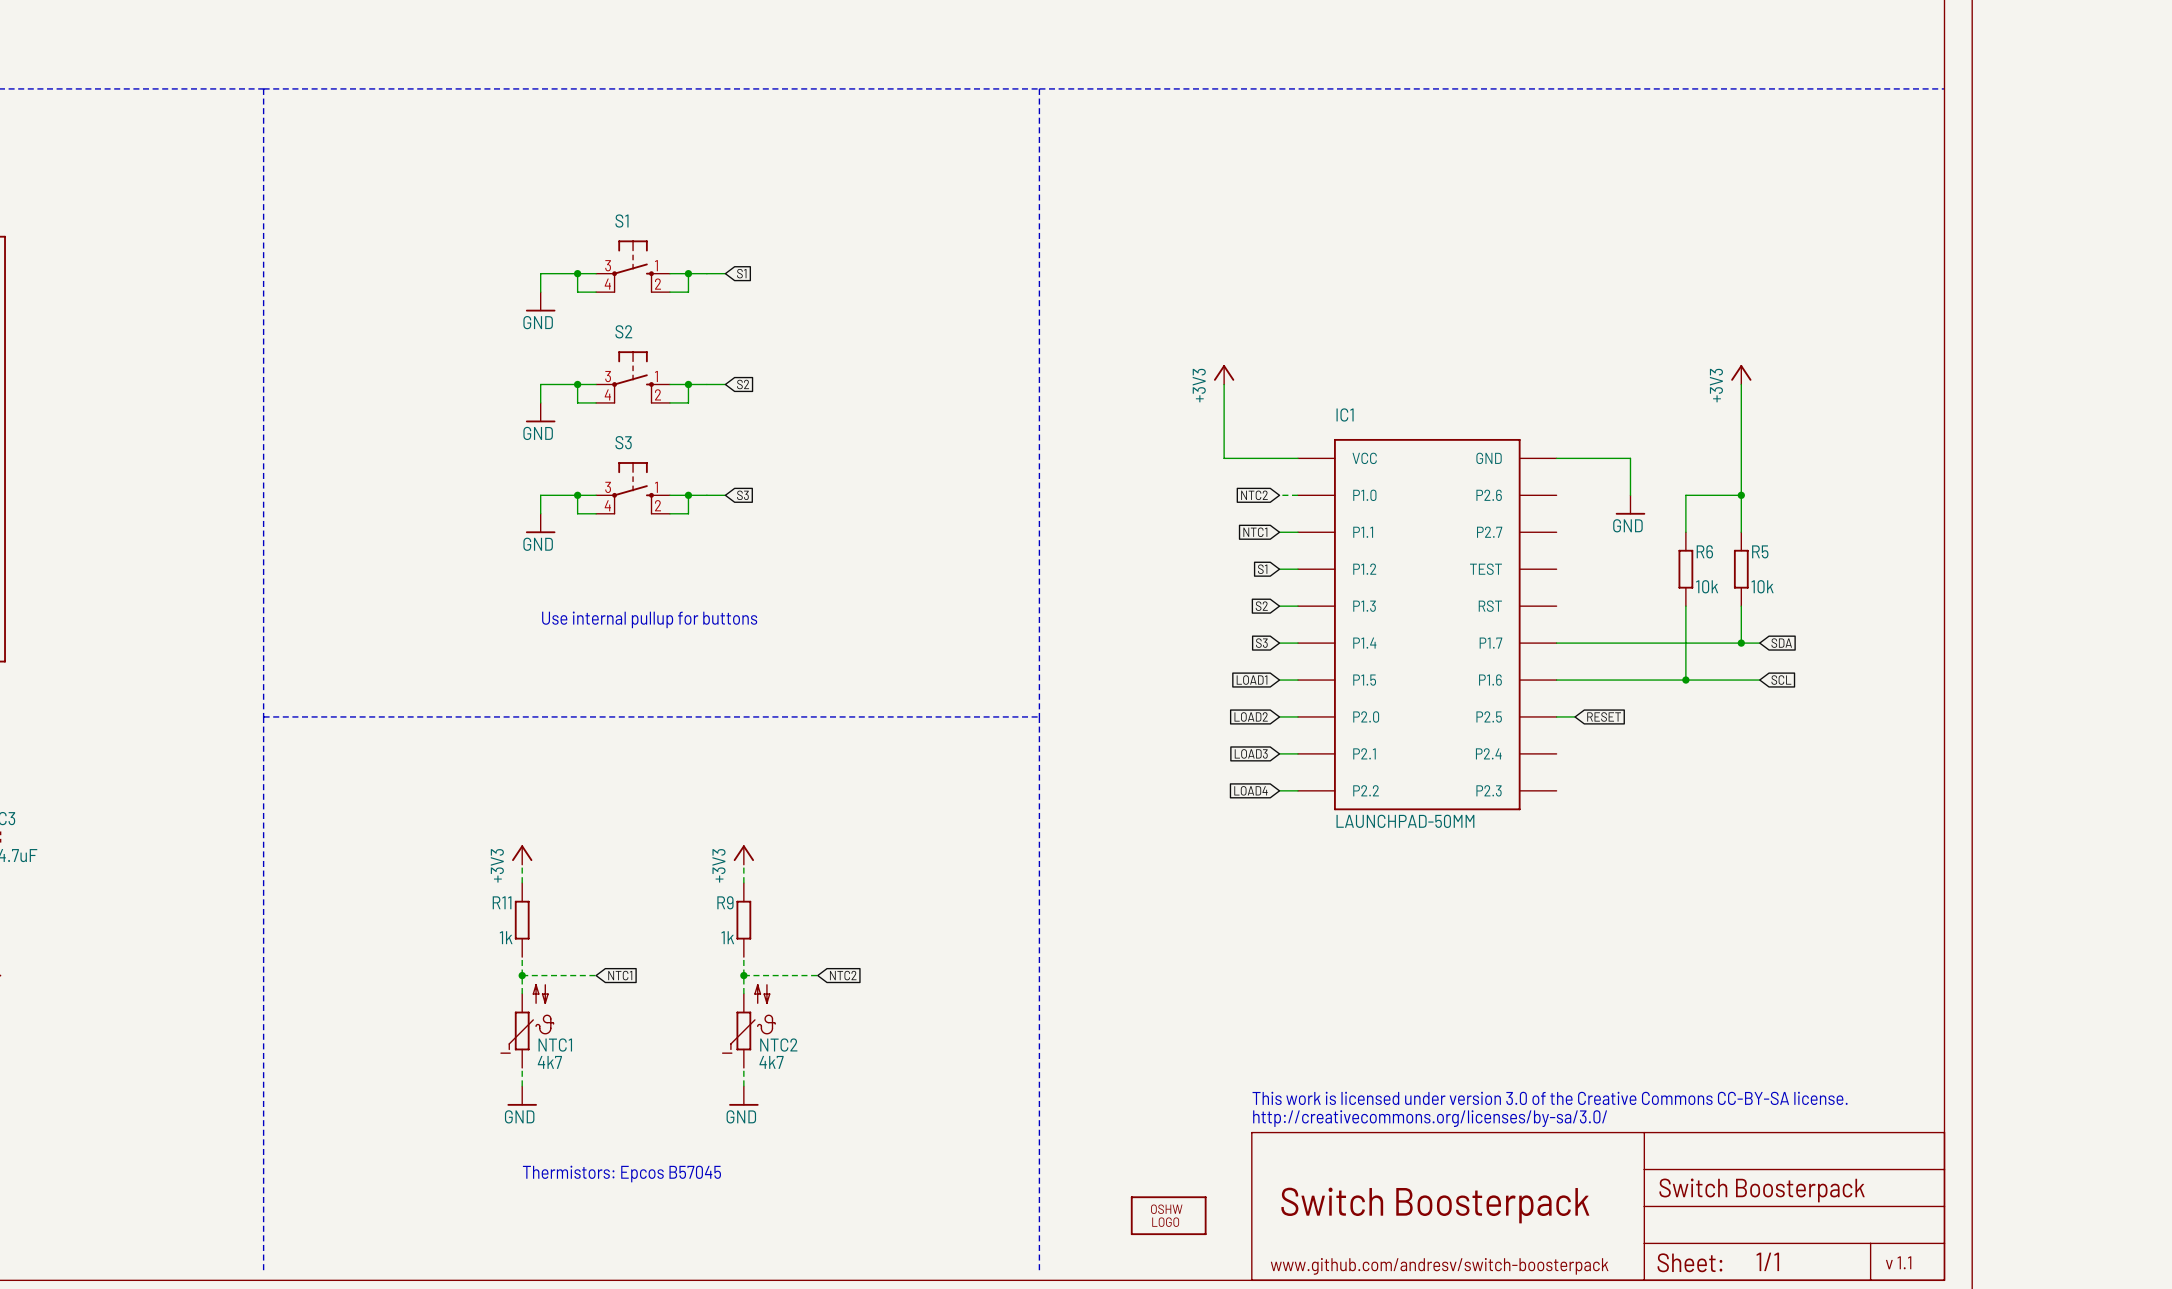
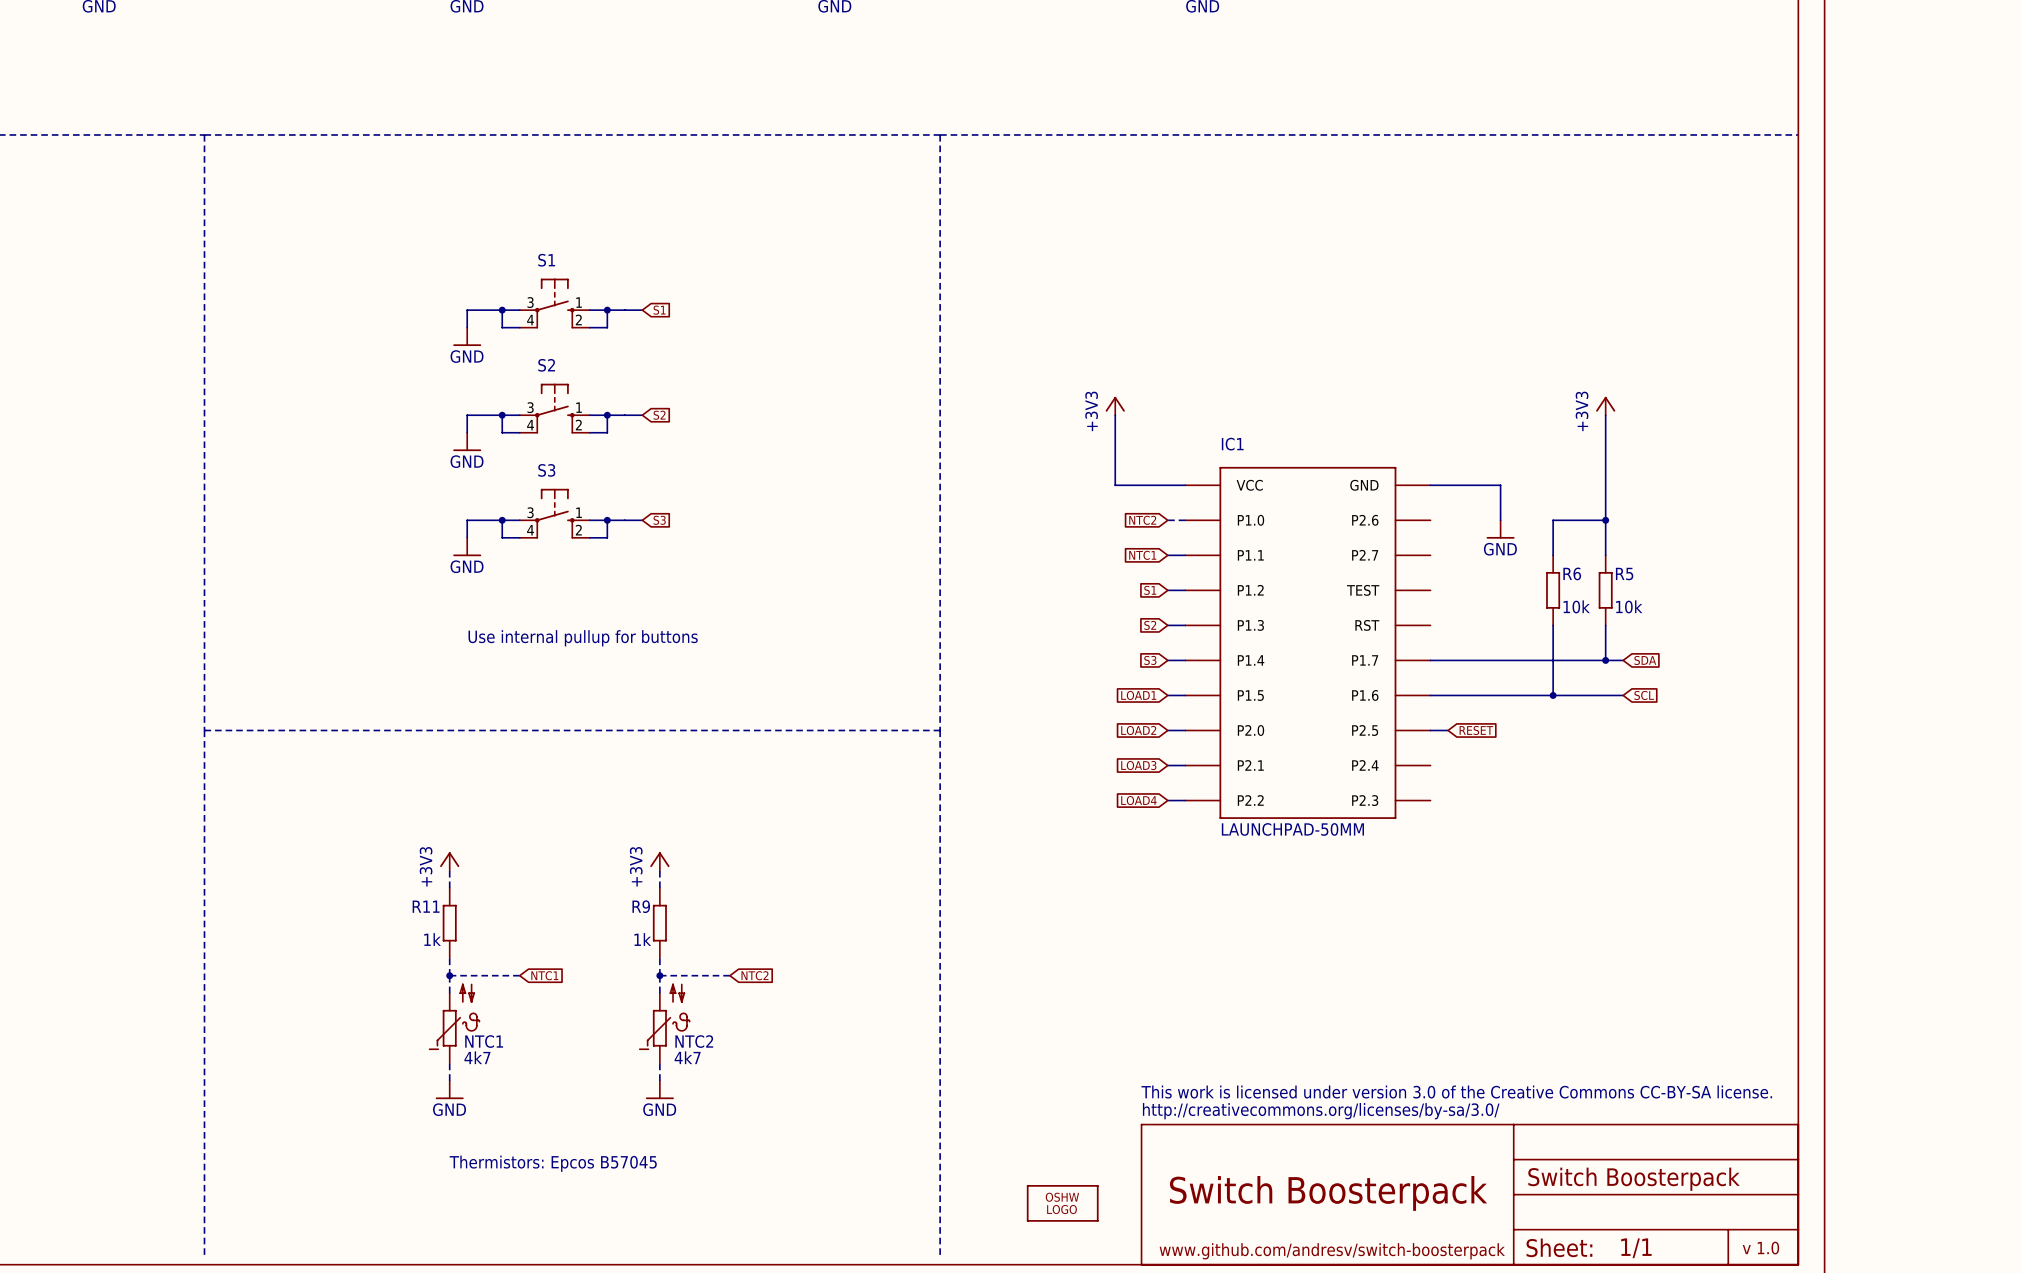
text: v 1.1 (1898, 1262) -> v 1.0 (1760, 1248)

